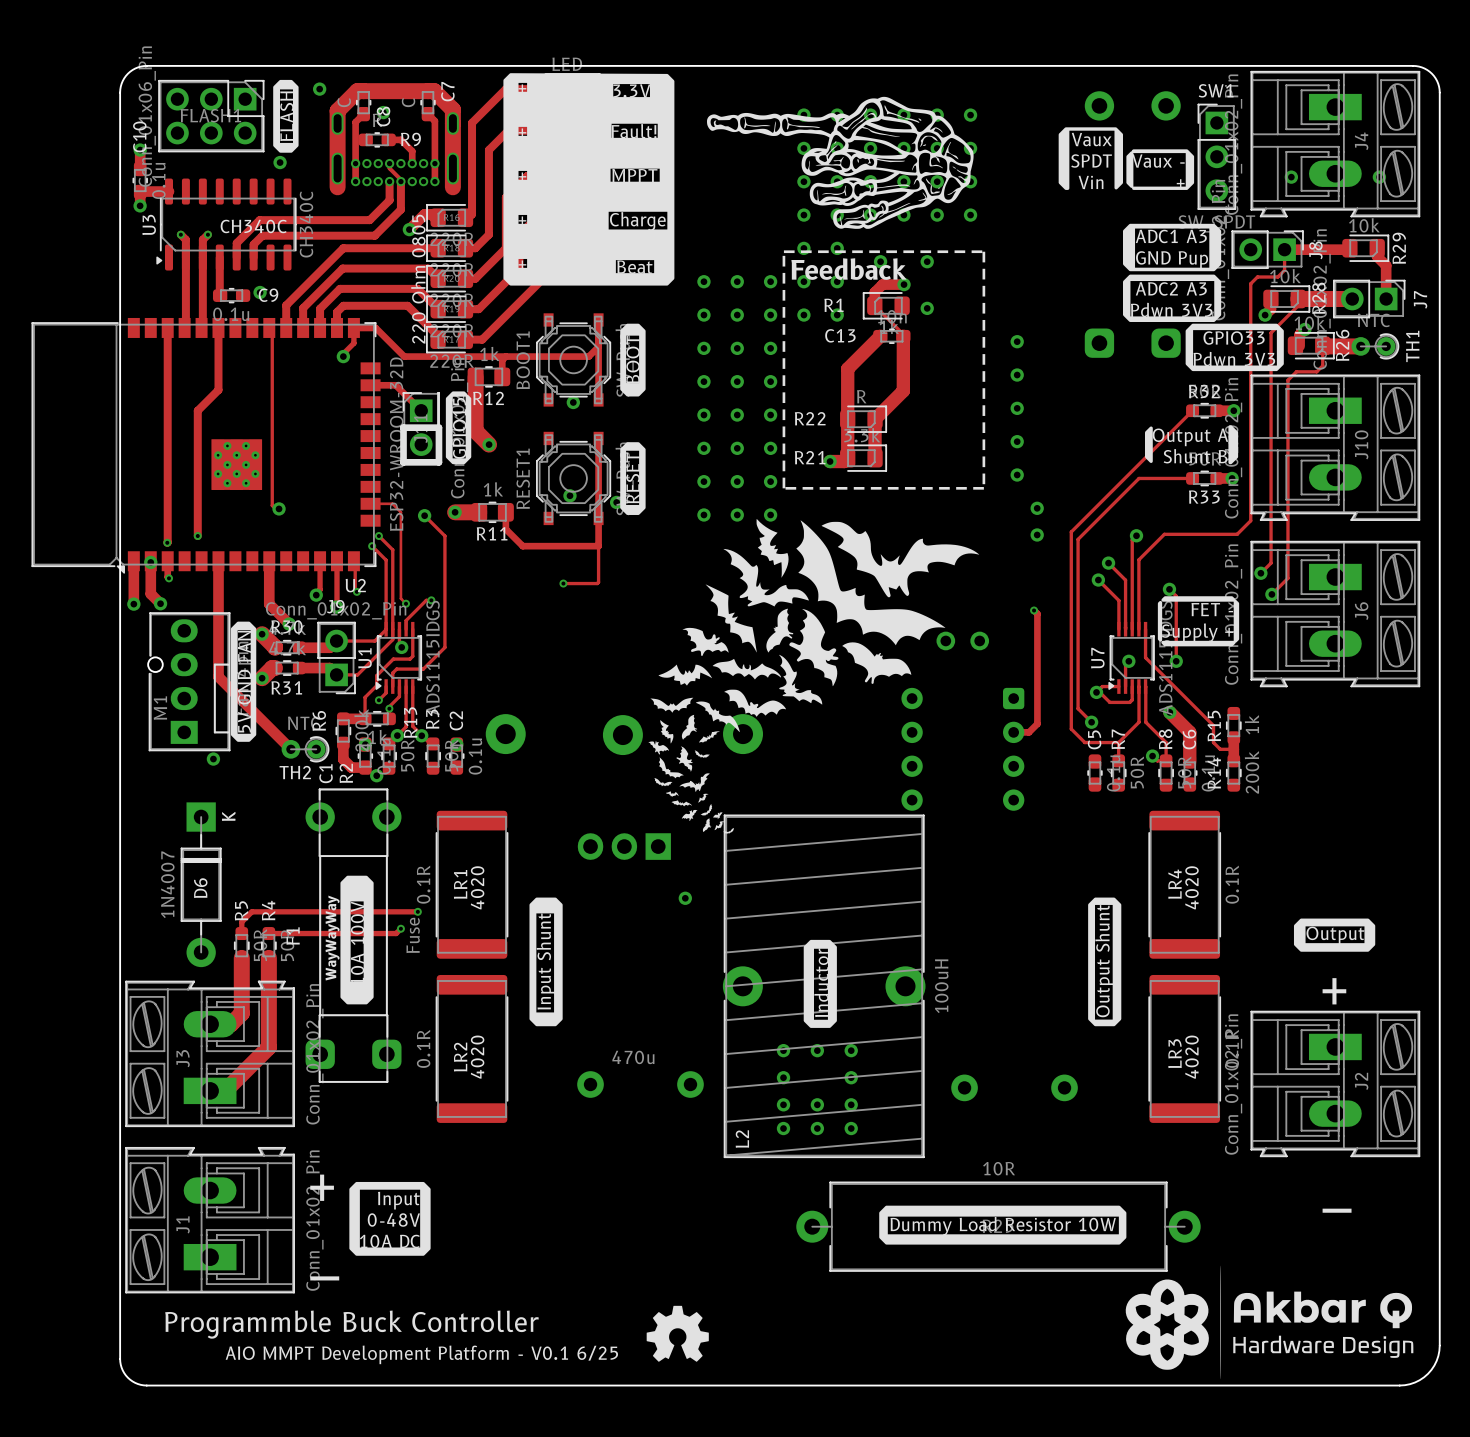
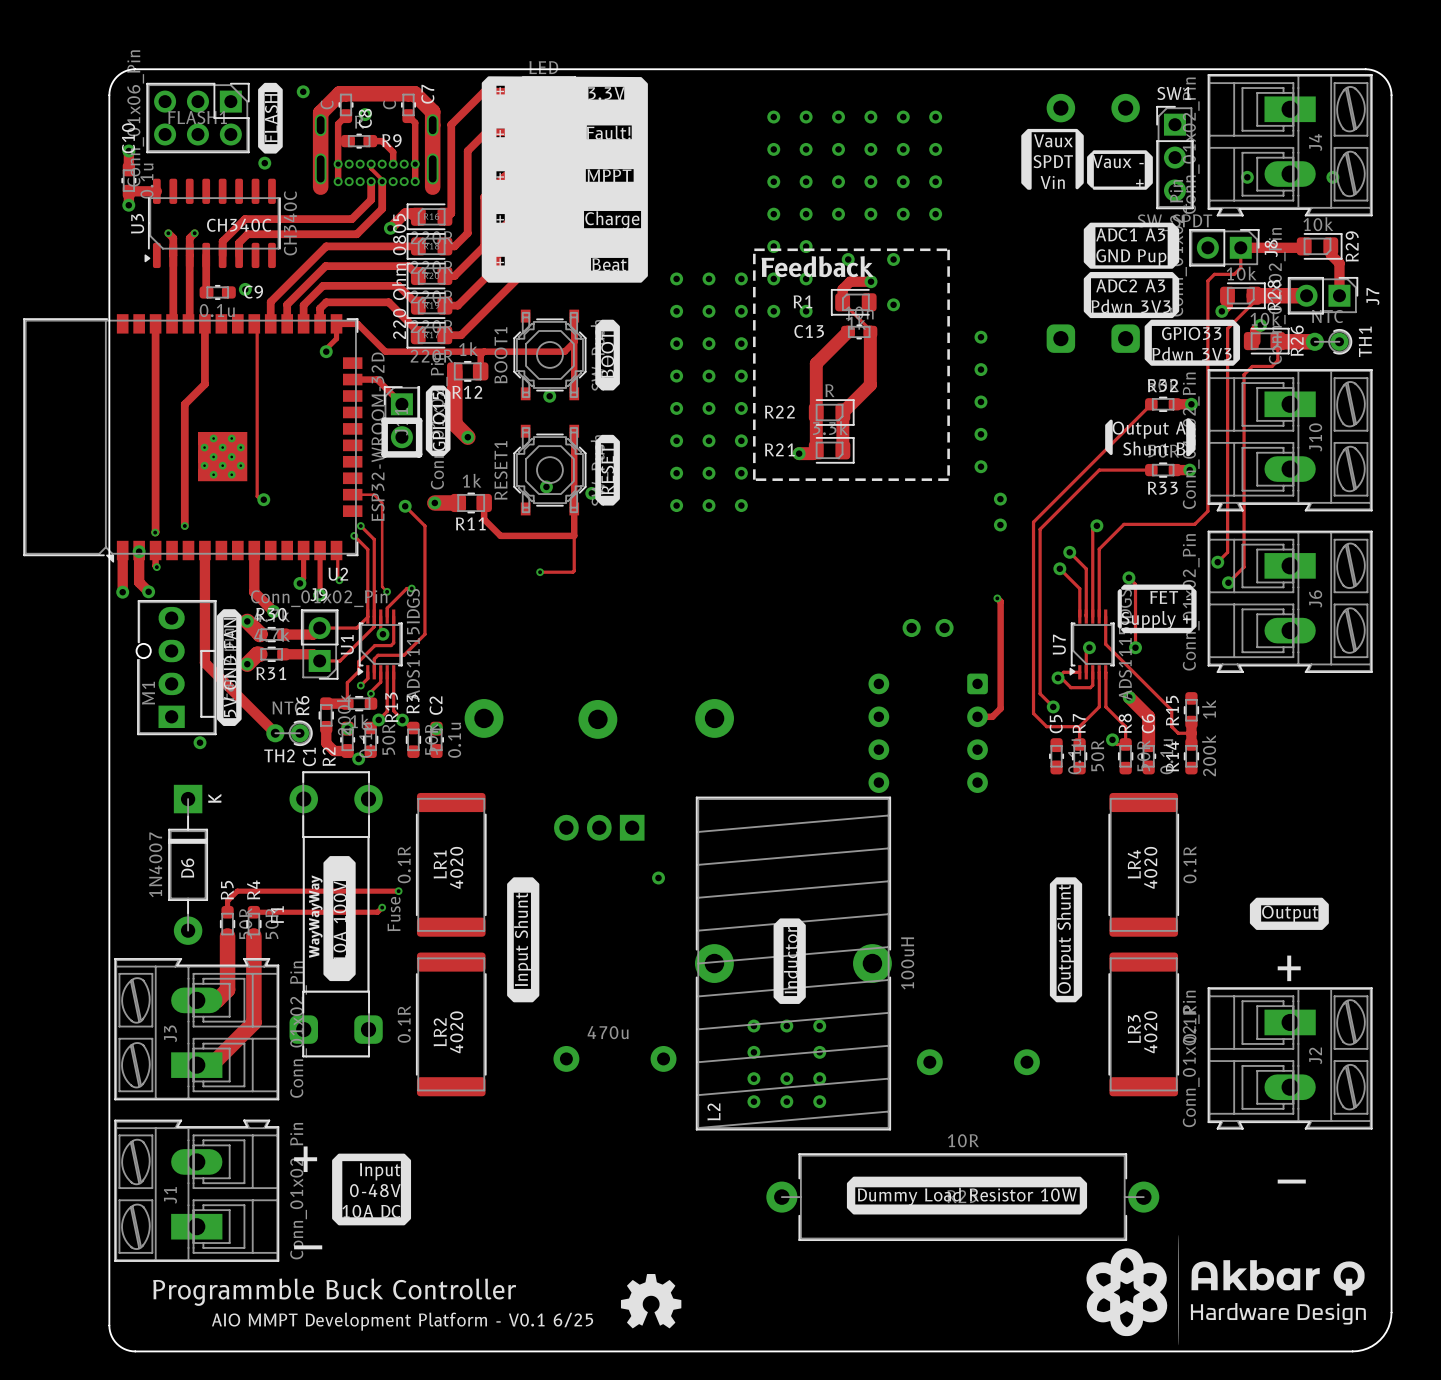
drawing: [707, 96, 974, 229] -> none
drawing: [648, 519, 980, 834] -> none

